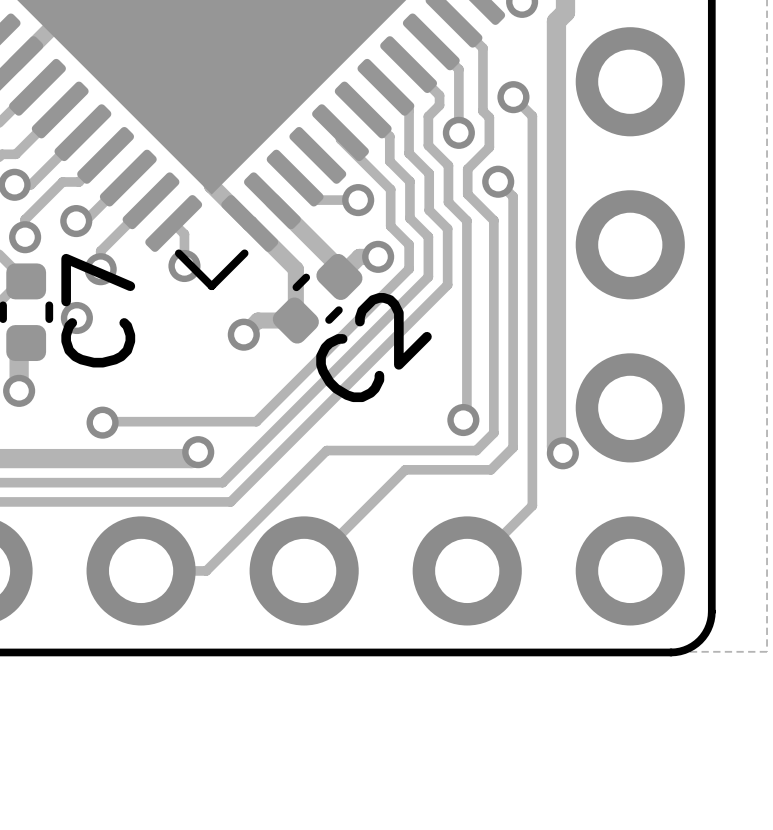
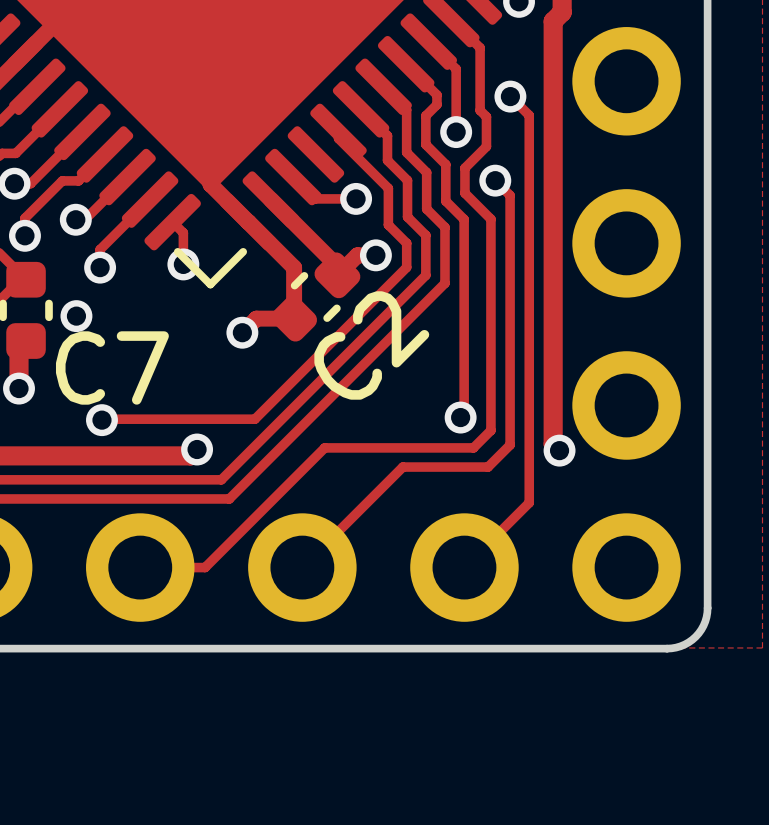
C7 name rotation: 0° (98, 310) -> 90° clockwise (112, 367)

